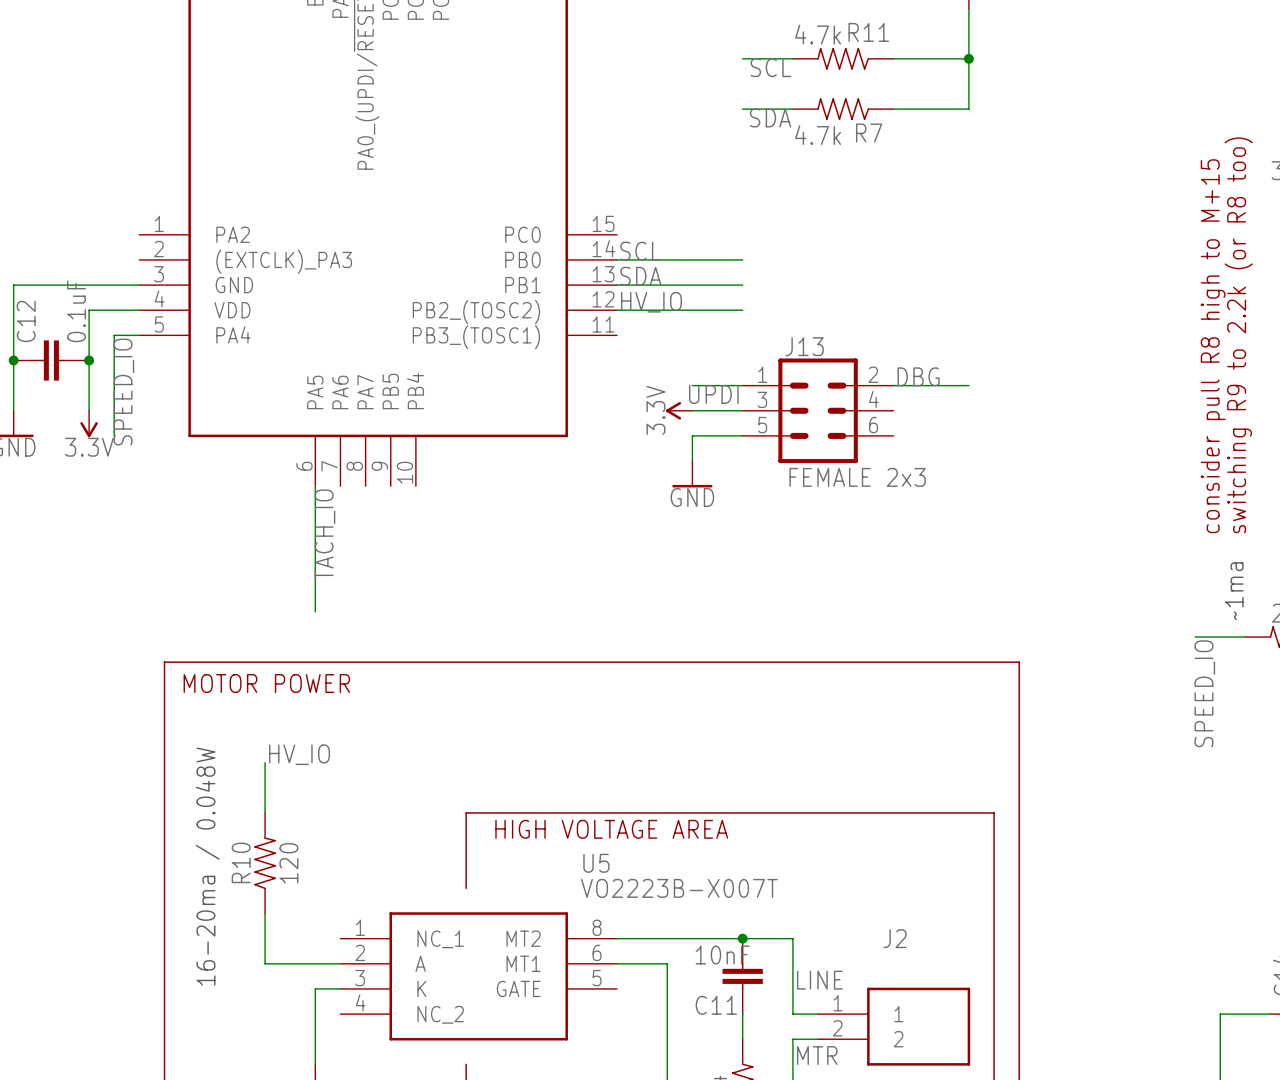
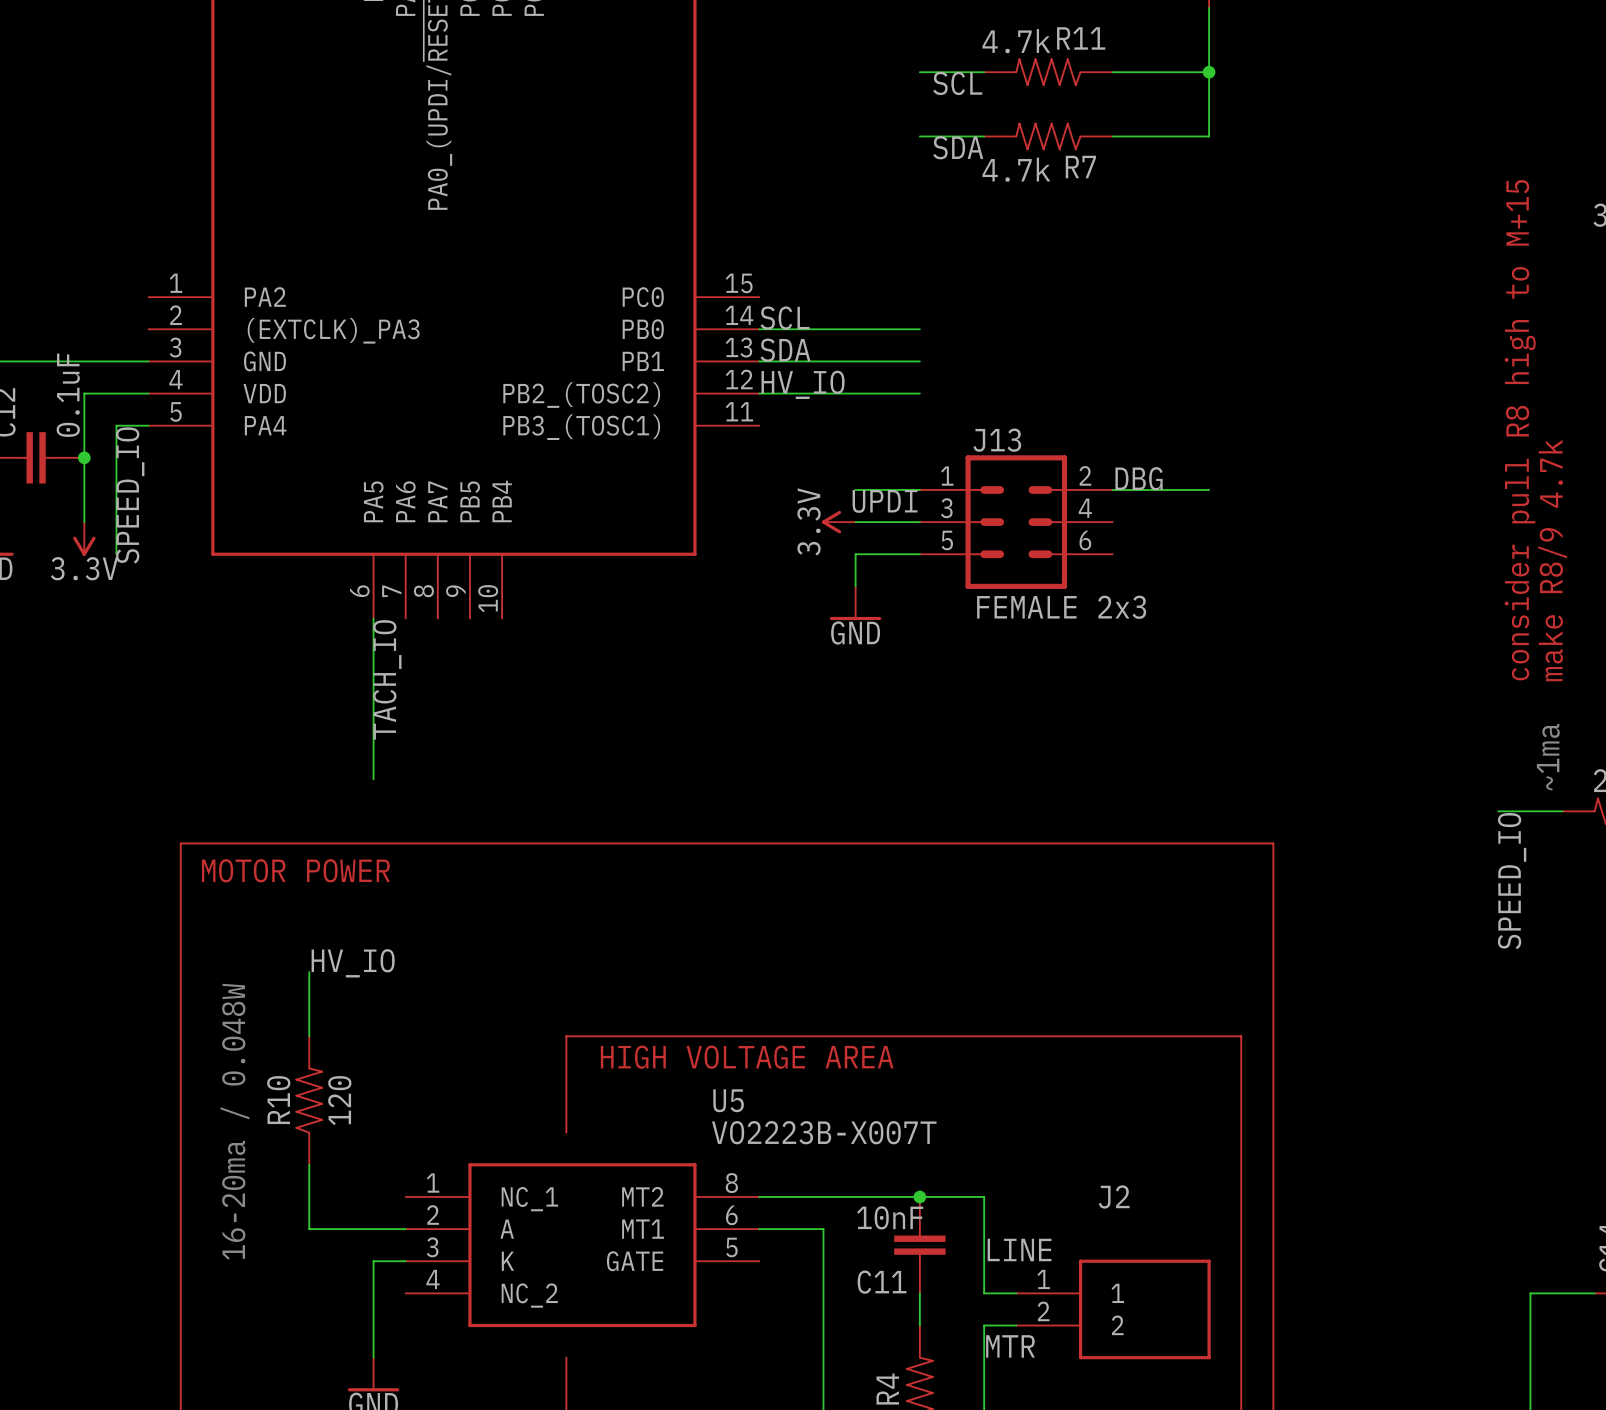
text: switching R9 to 2.2k (or R8 too) (1238, 335) -> make R8/9 4.7k (1552, 560)

